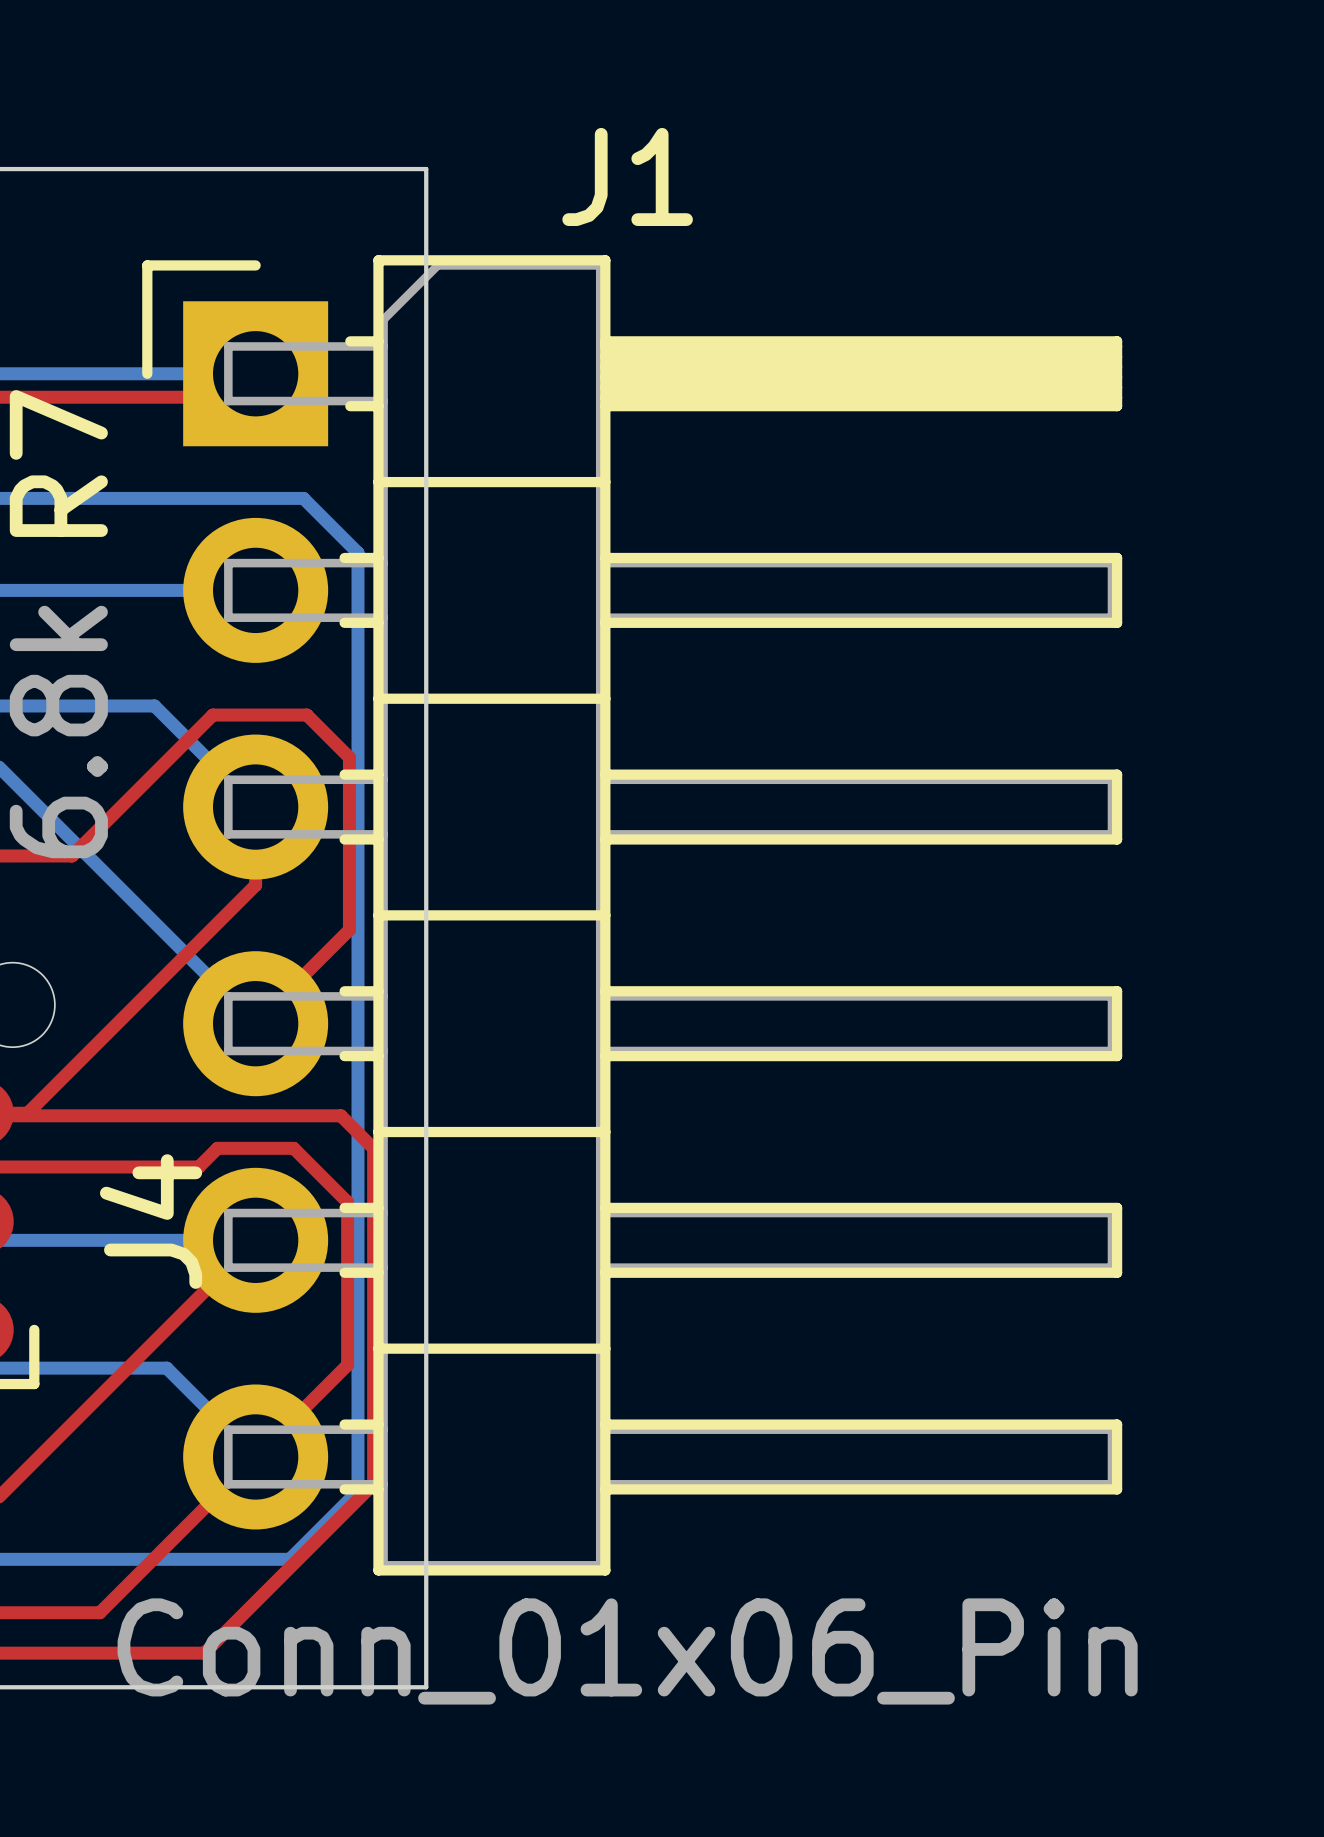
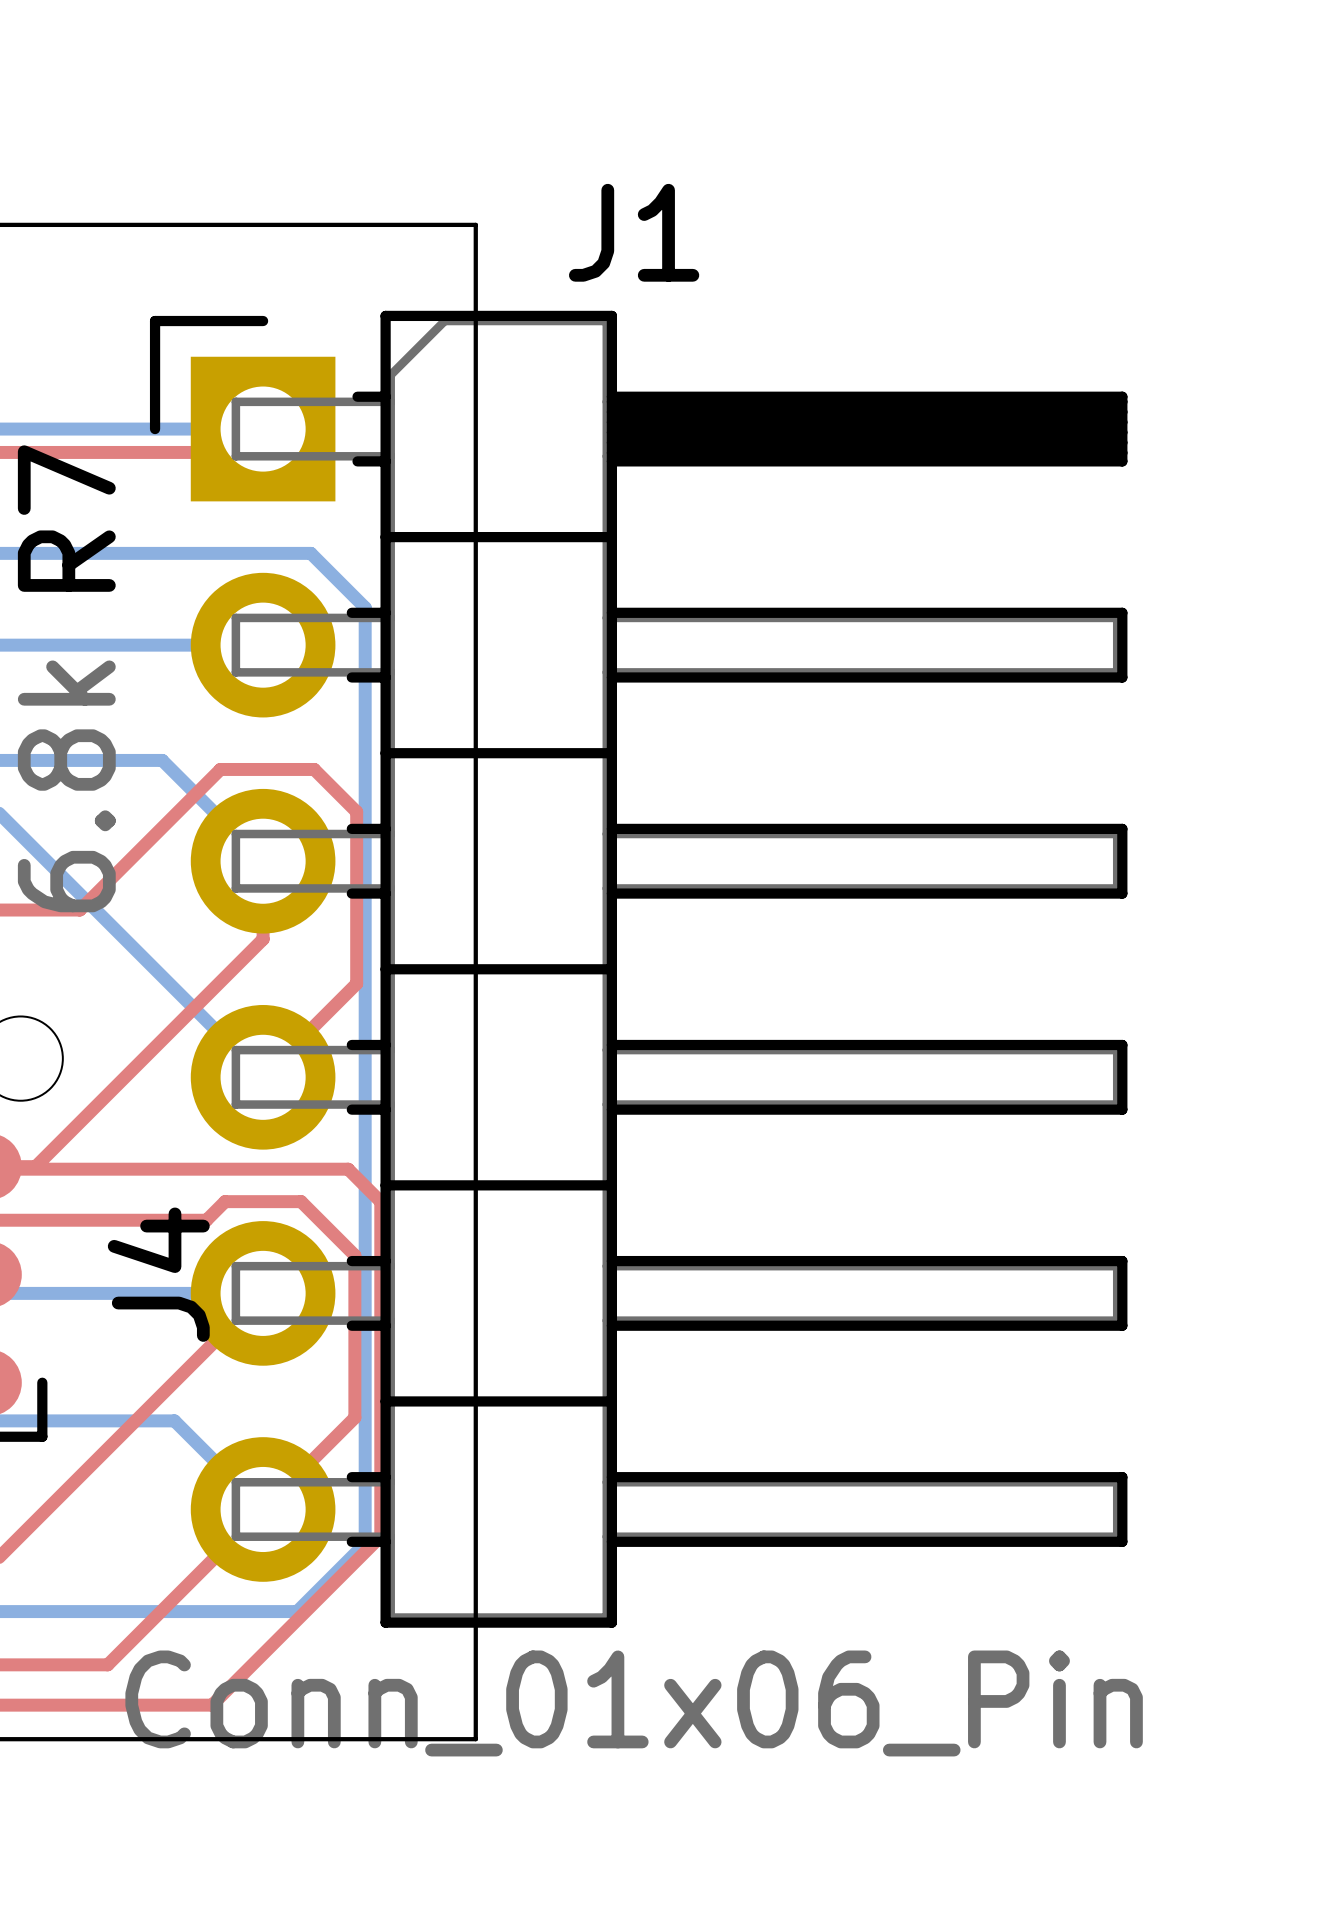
board edge: (426, 169) (426, 1687) -> (433, 224) (475, 224) (475, 1739) (433, 1739)

